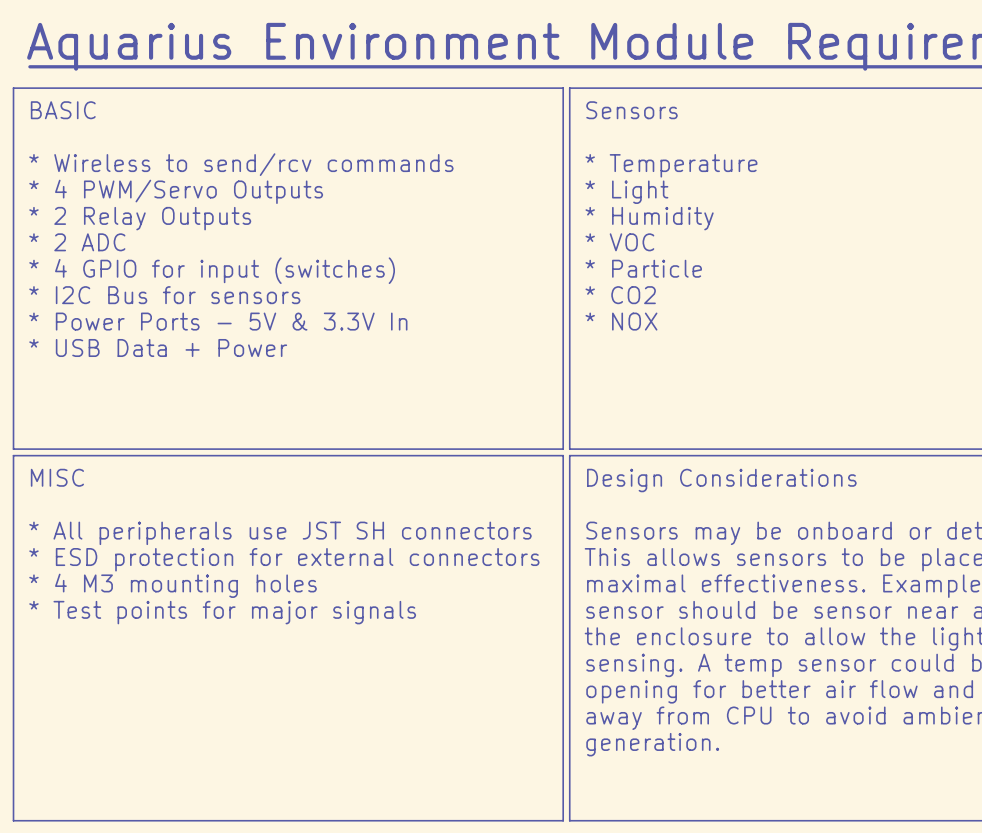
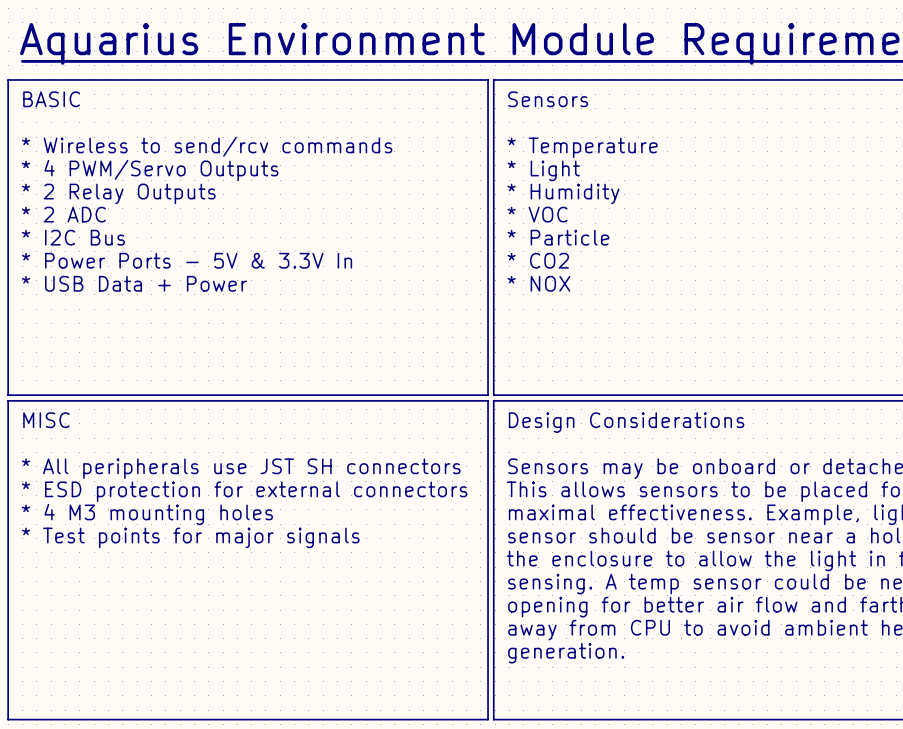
text: * 4 GPIO for input (switches) (212, 270) -> * I2C Bus (73, 237)
text: * I2C Bus for sensors (164, 295) -> * Power Ports - 5V & 3.3V In (186, 260)
text: * Power Ports - 5V & 3.3V In (218, 321) -> * USB Data + Power (134, 283)
text: * USB Data + Power (158, 347) -> none

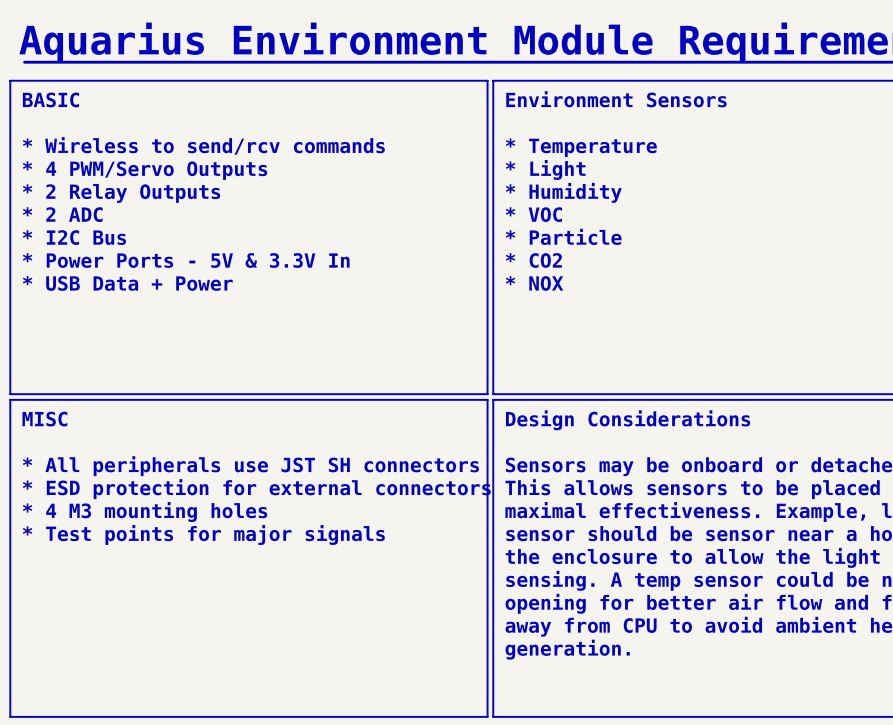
text: Sensors (548, 99) -> Environment Sensors (616, 99)

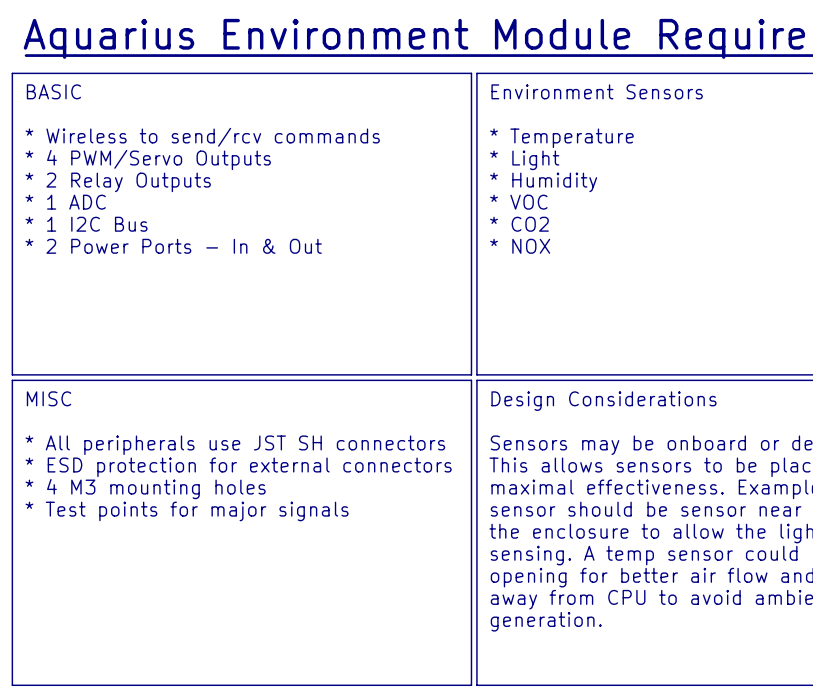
text: * 2 ADC (62, 214) -> * 1 ADC (65, 202)
text: * Particle (563, 236) -> * CO2 (519, 224)
text: * I2C Bus (74, 237) -> * 1 I2C Bus (86, 224)
text: * Power Ports - 5V & 3.3V In (186, 260) -> * 2 Power Ports - In & Out (173, 246)
text: * CO2 (533, 260) -> * NOX (520, 246)
text: * USB Data + Power (127, 283) -> none
text: * NOX (534, 283) -> none

